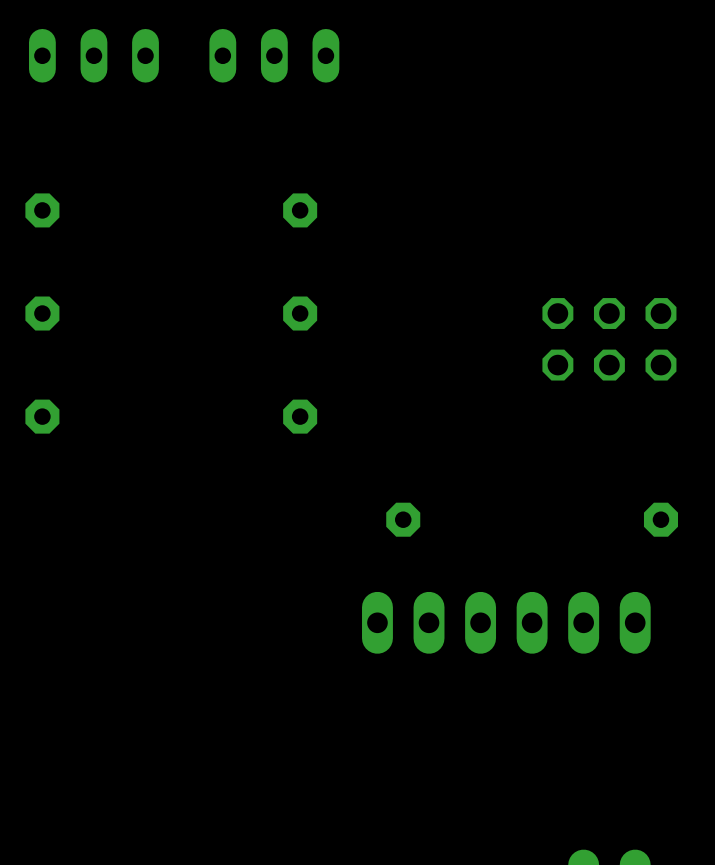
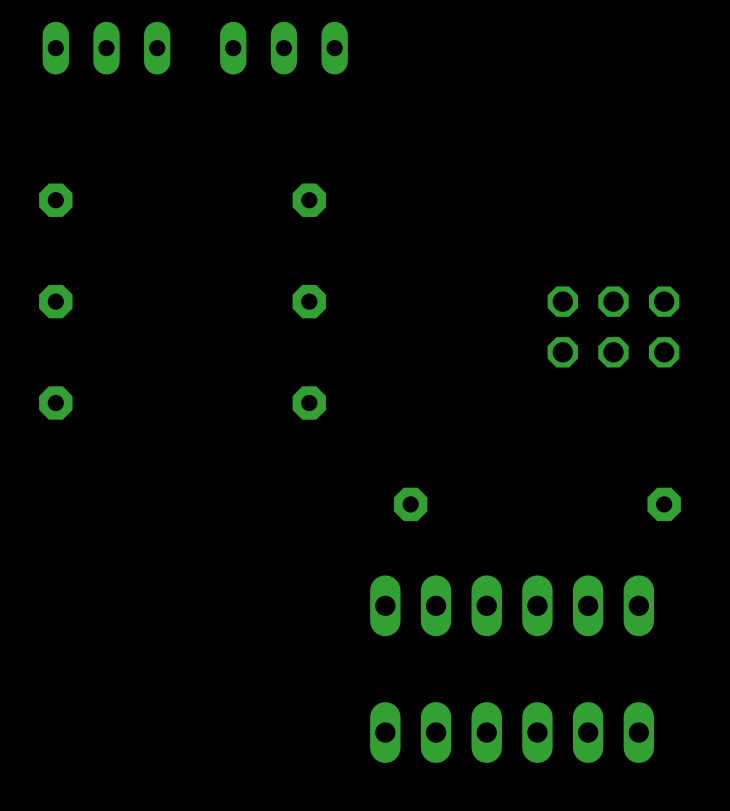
part: none -> (512, 732)

